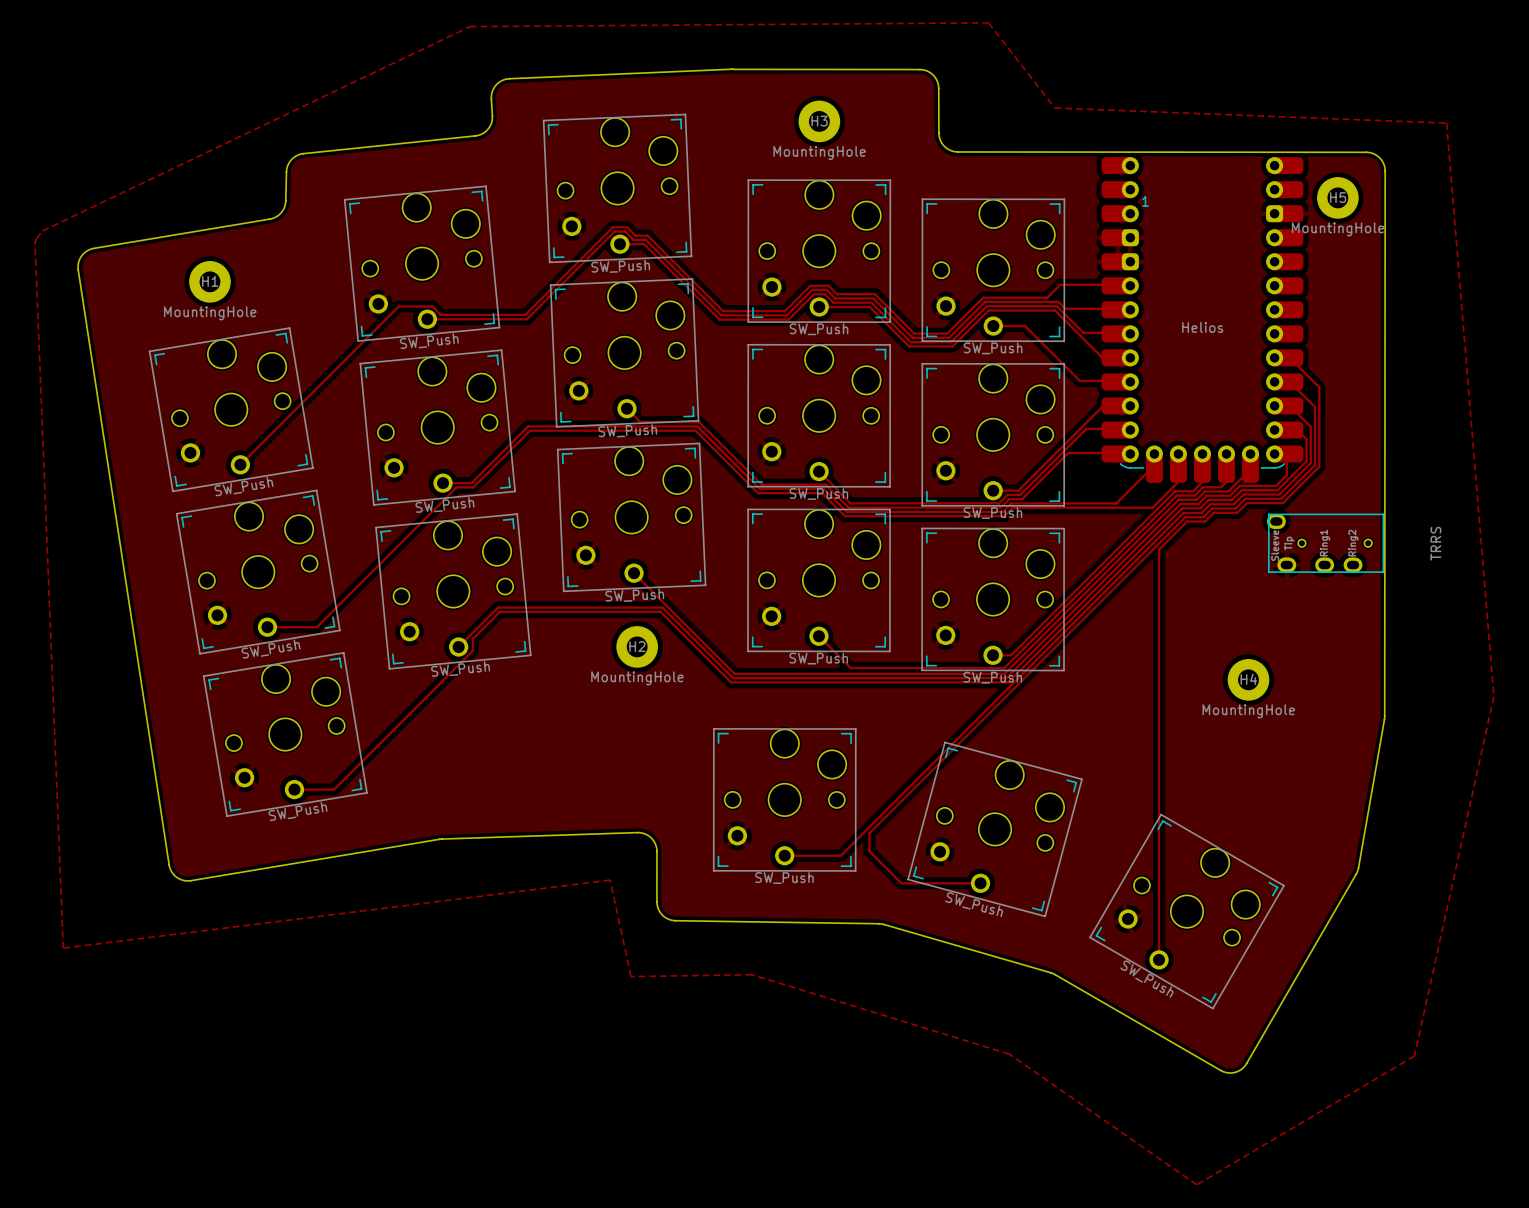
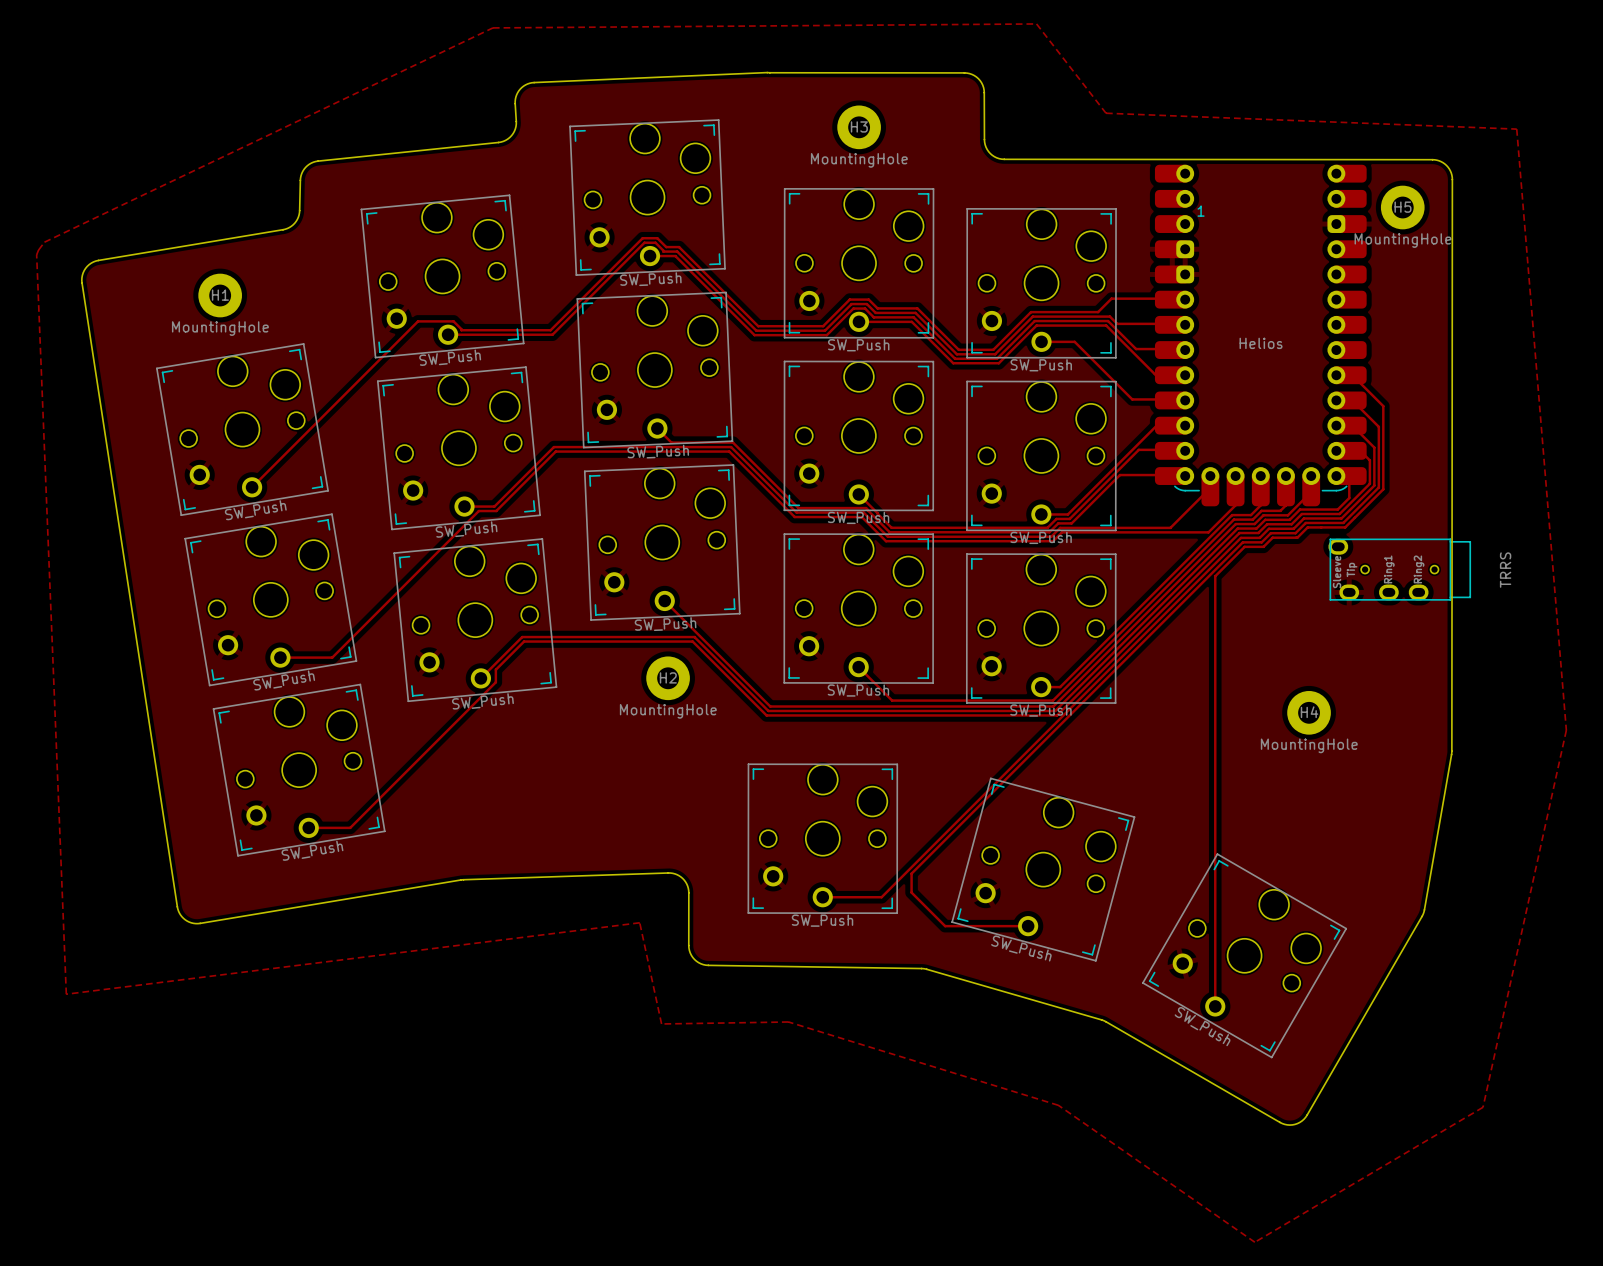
part footprint: [1266, 513, 1385, 573] -> [1328, 538, 1471, 601]

